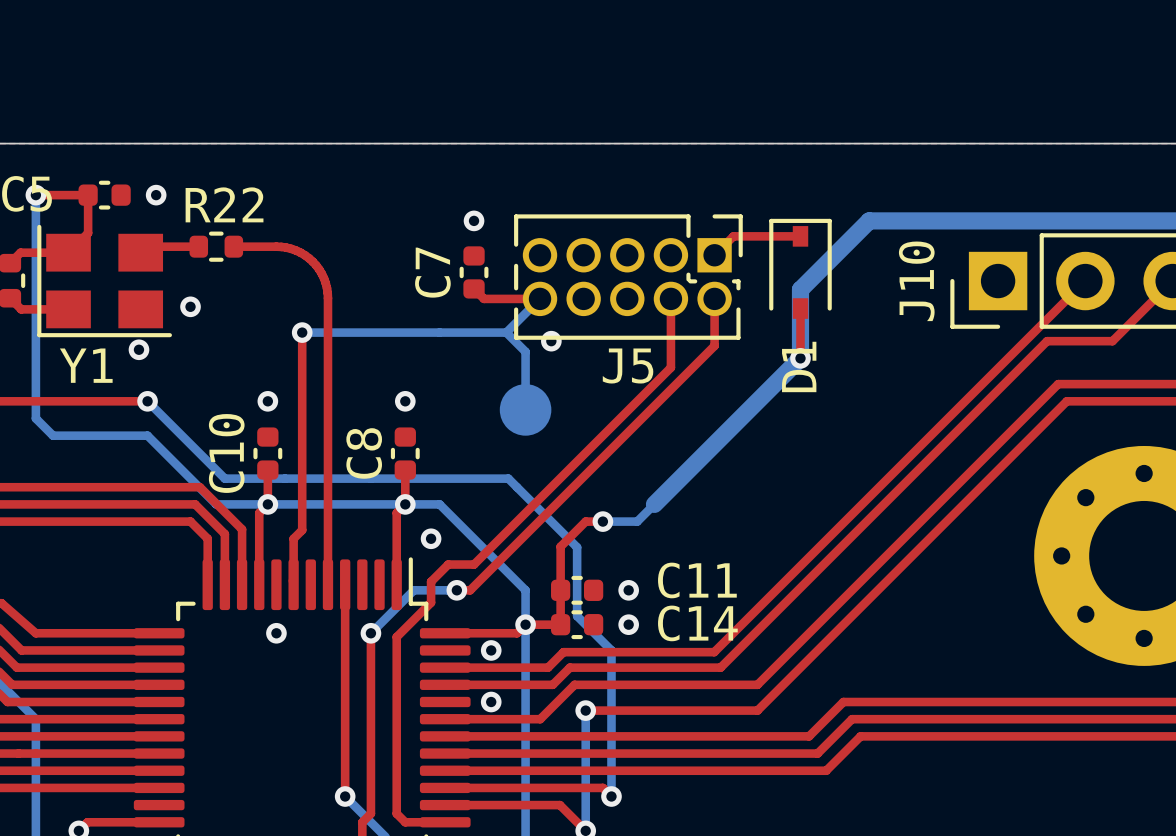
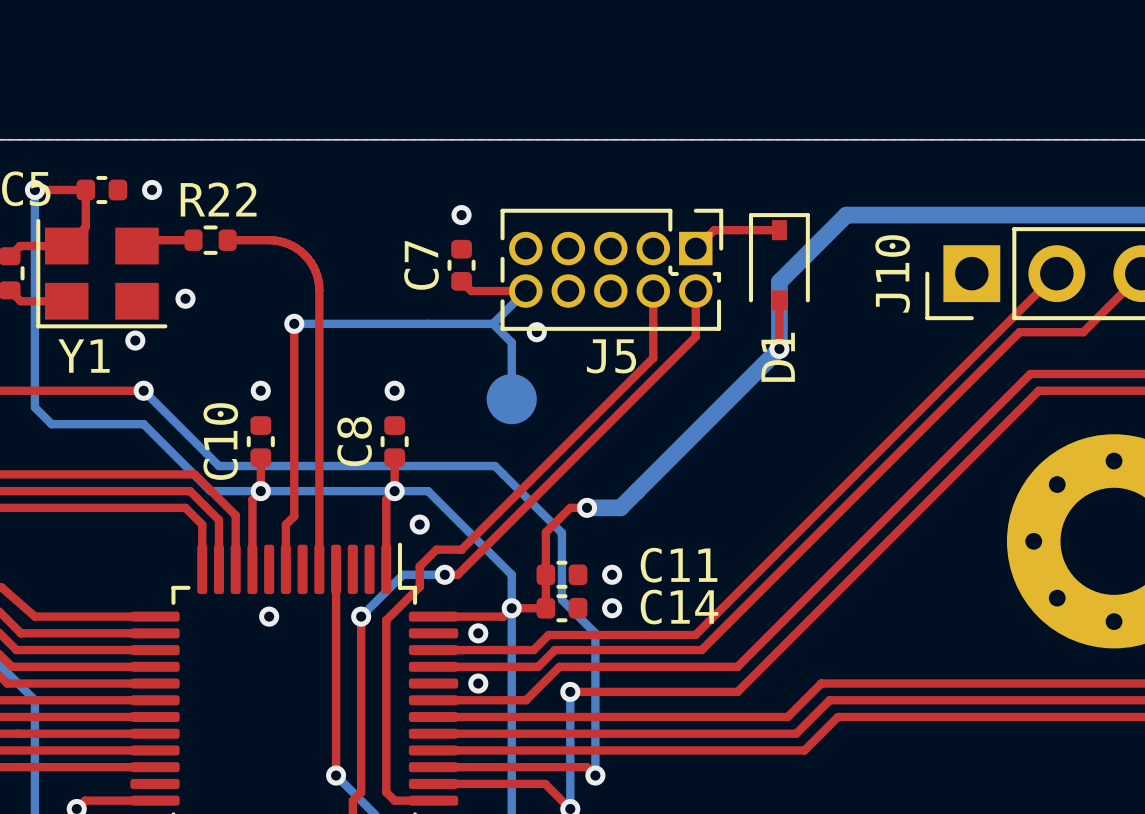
bottom track width: thin (654, 504) (637, 521) (602, 521) -> thick (637, 491) (620, 507) (587, 507)

